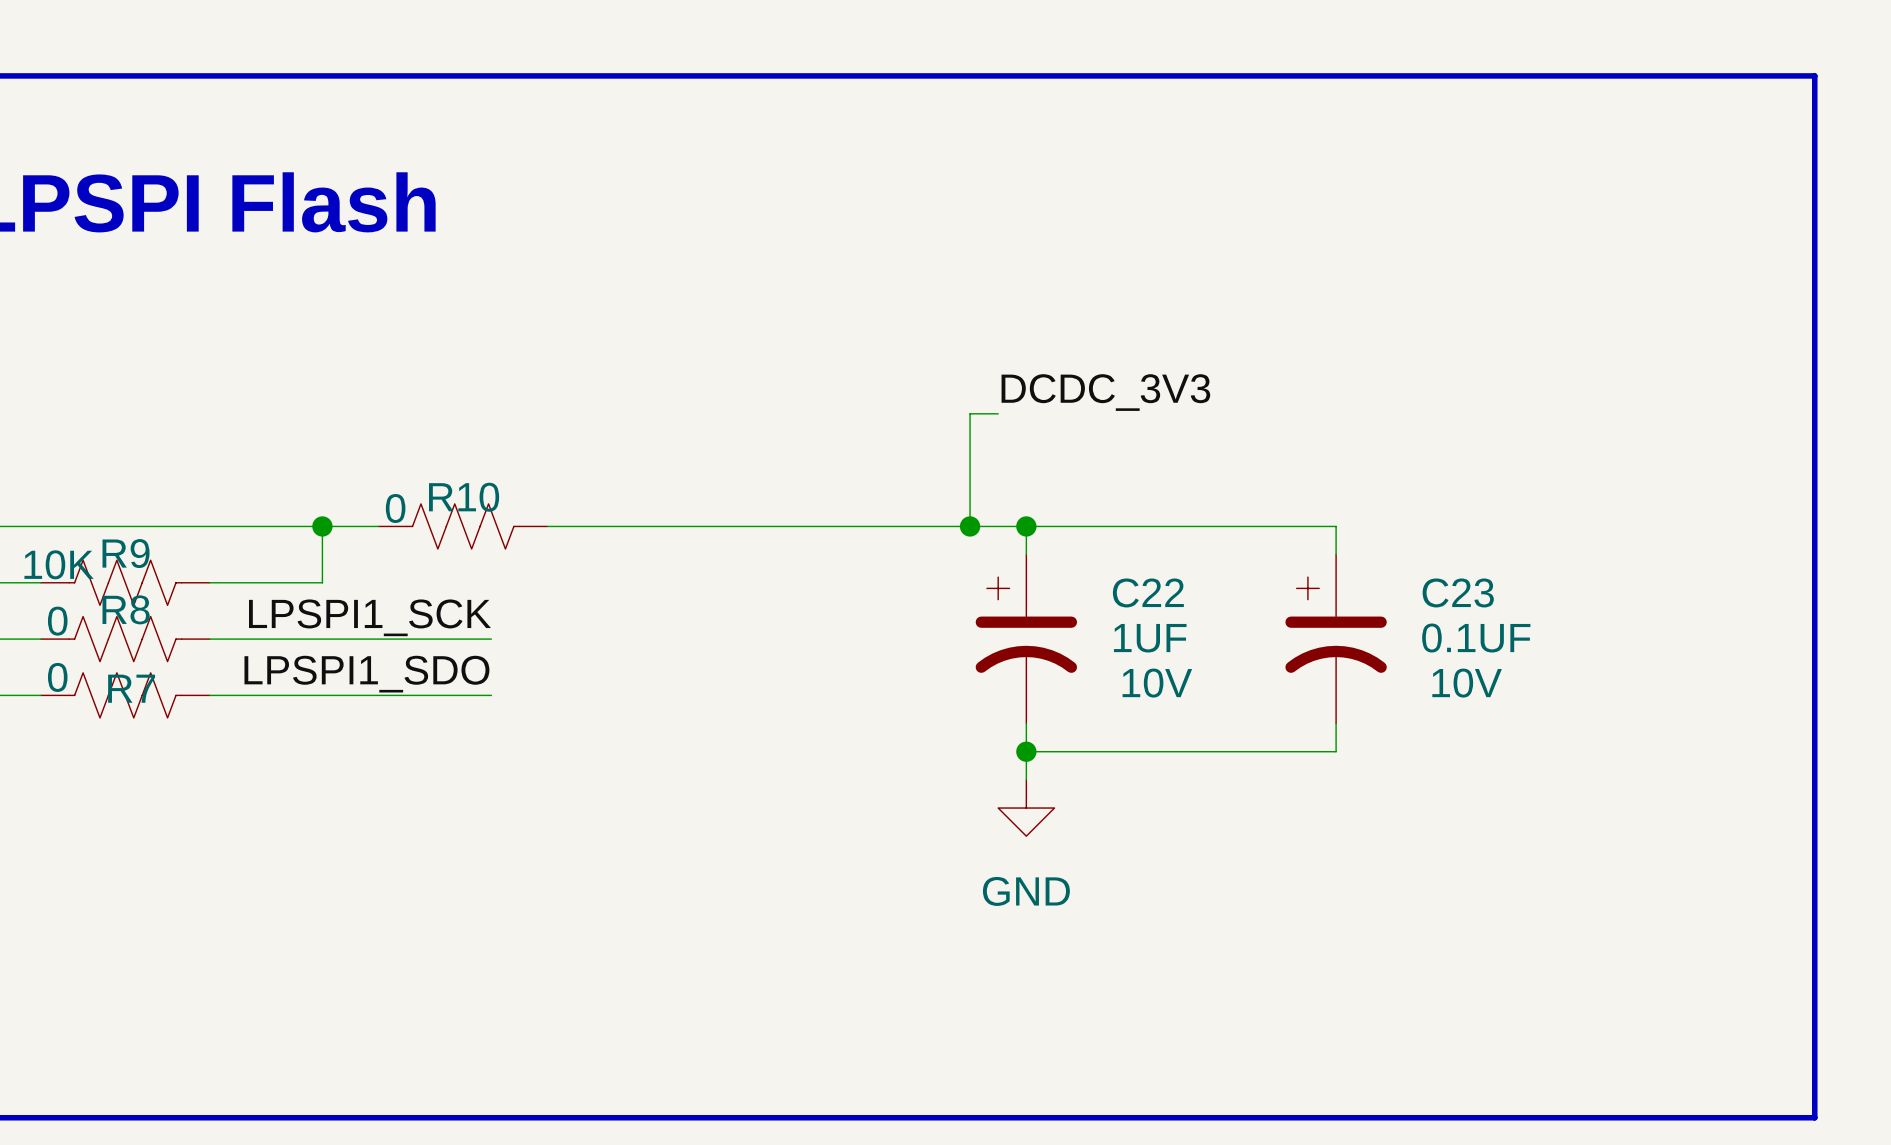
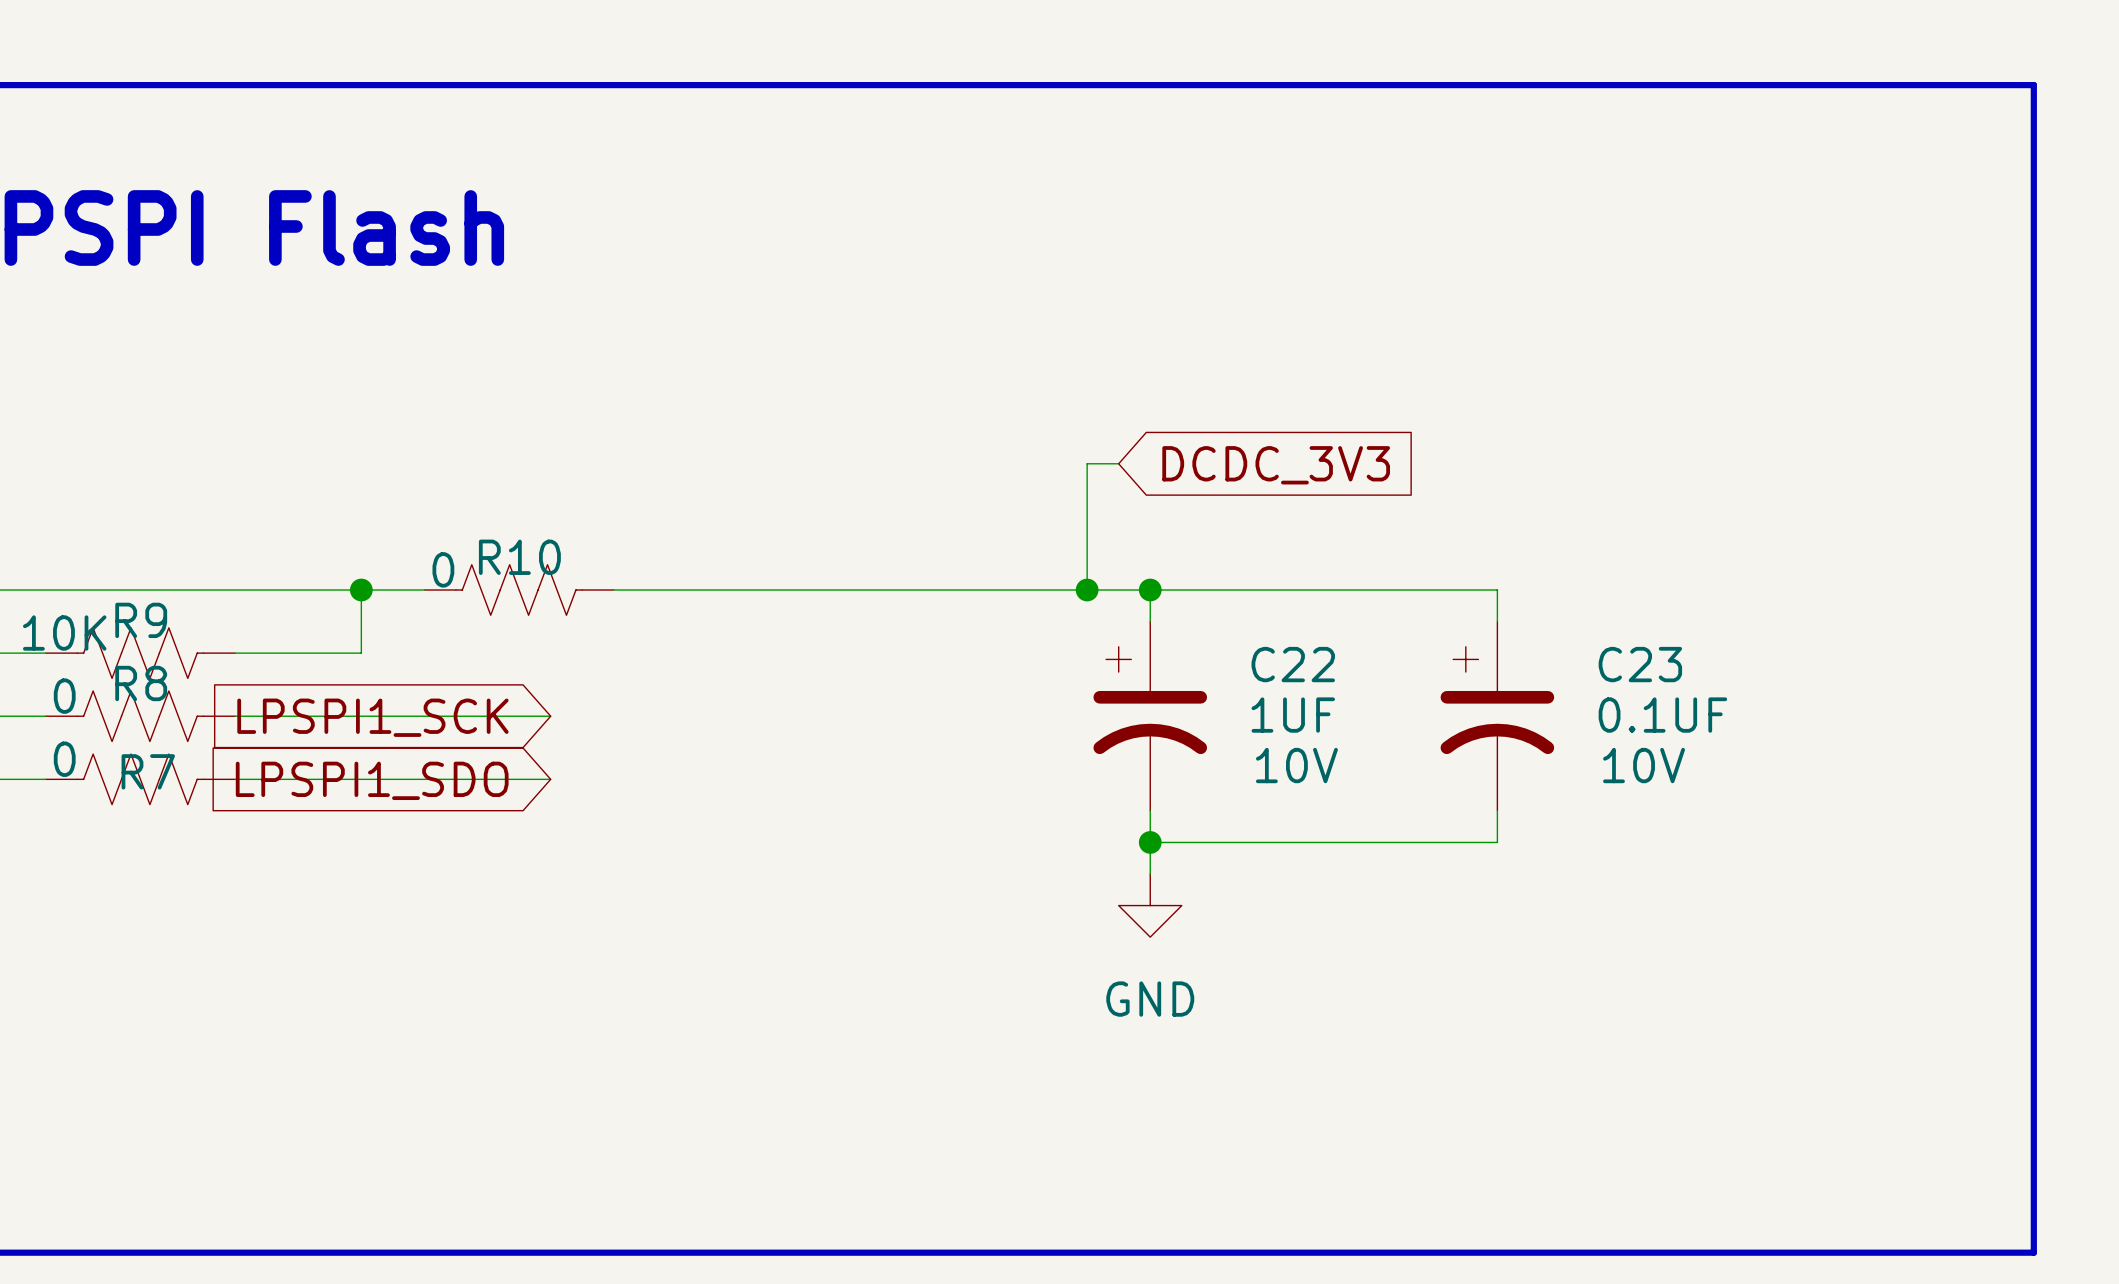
label: DCDC_3V3 (1105, 392) -> none
global label: none -> DCDC_3V3 (1276, 465)
label: LPSPI1_SCK (369, 617) -> none
global label: none -> LPSPI1_SCK (372, 717)
label: LPSPI1_SDO (366, 674) -> none
global label: none -> LPSPI1_SDO (372, 780)

